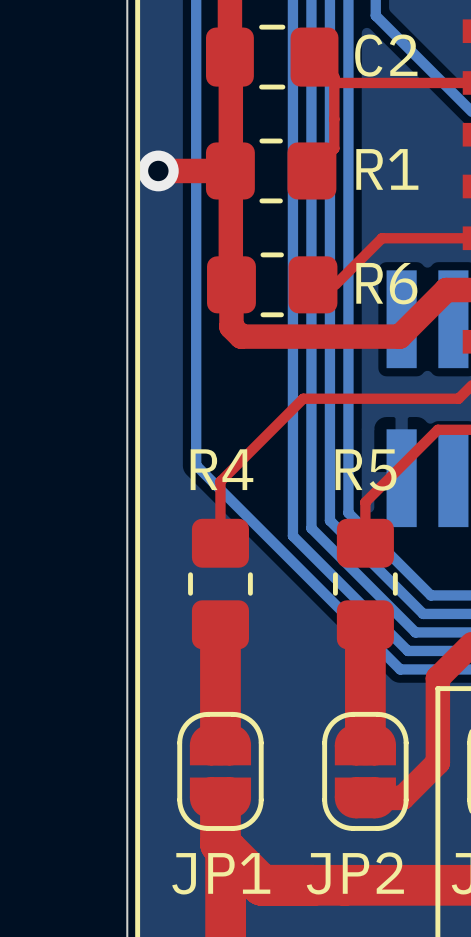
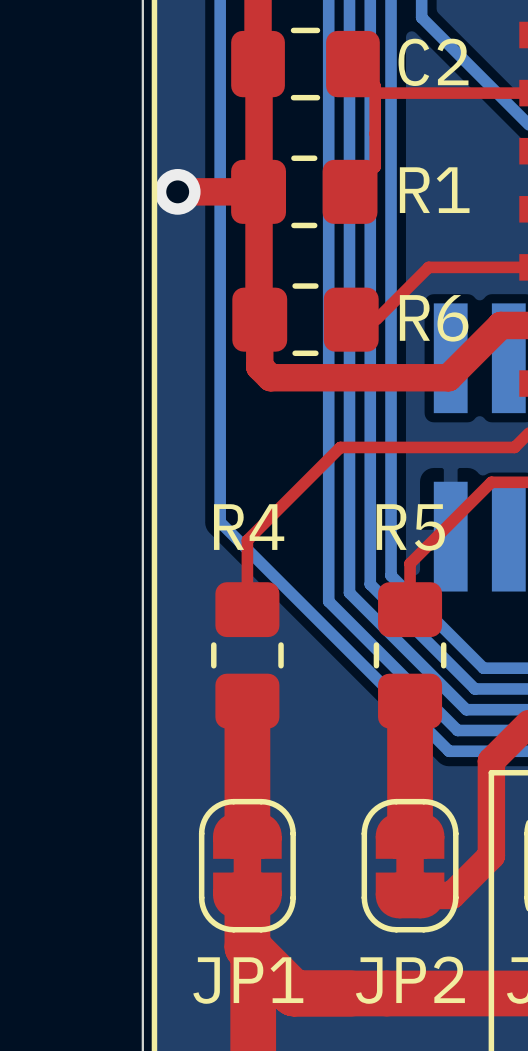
JP1 footprint: [177, 711, 264, 831] -> [198, 798, 296, 933]
JP2 footprint: [322, 711, 409, 831] -> [361, 798, 459, 933]

